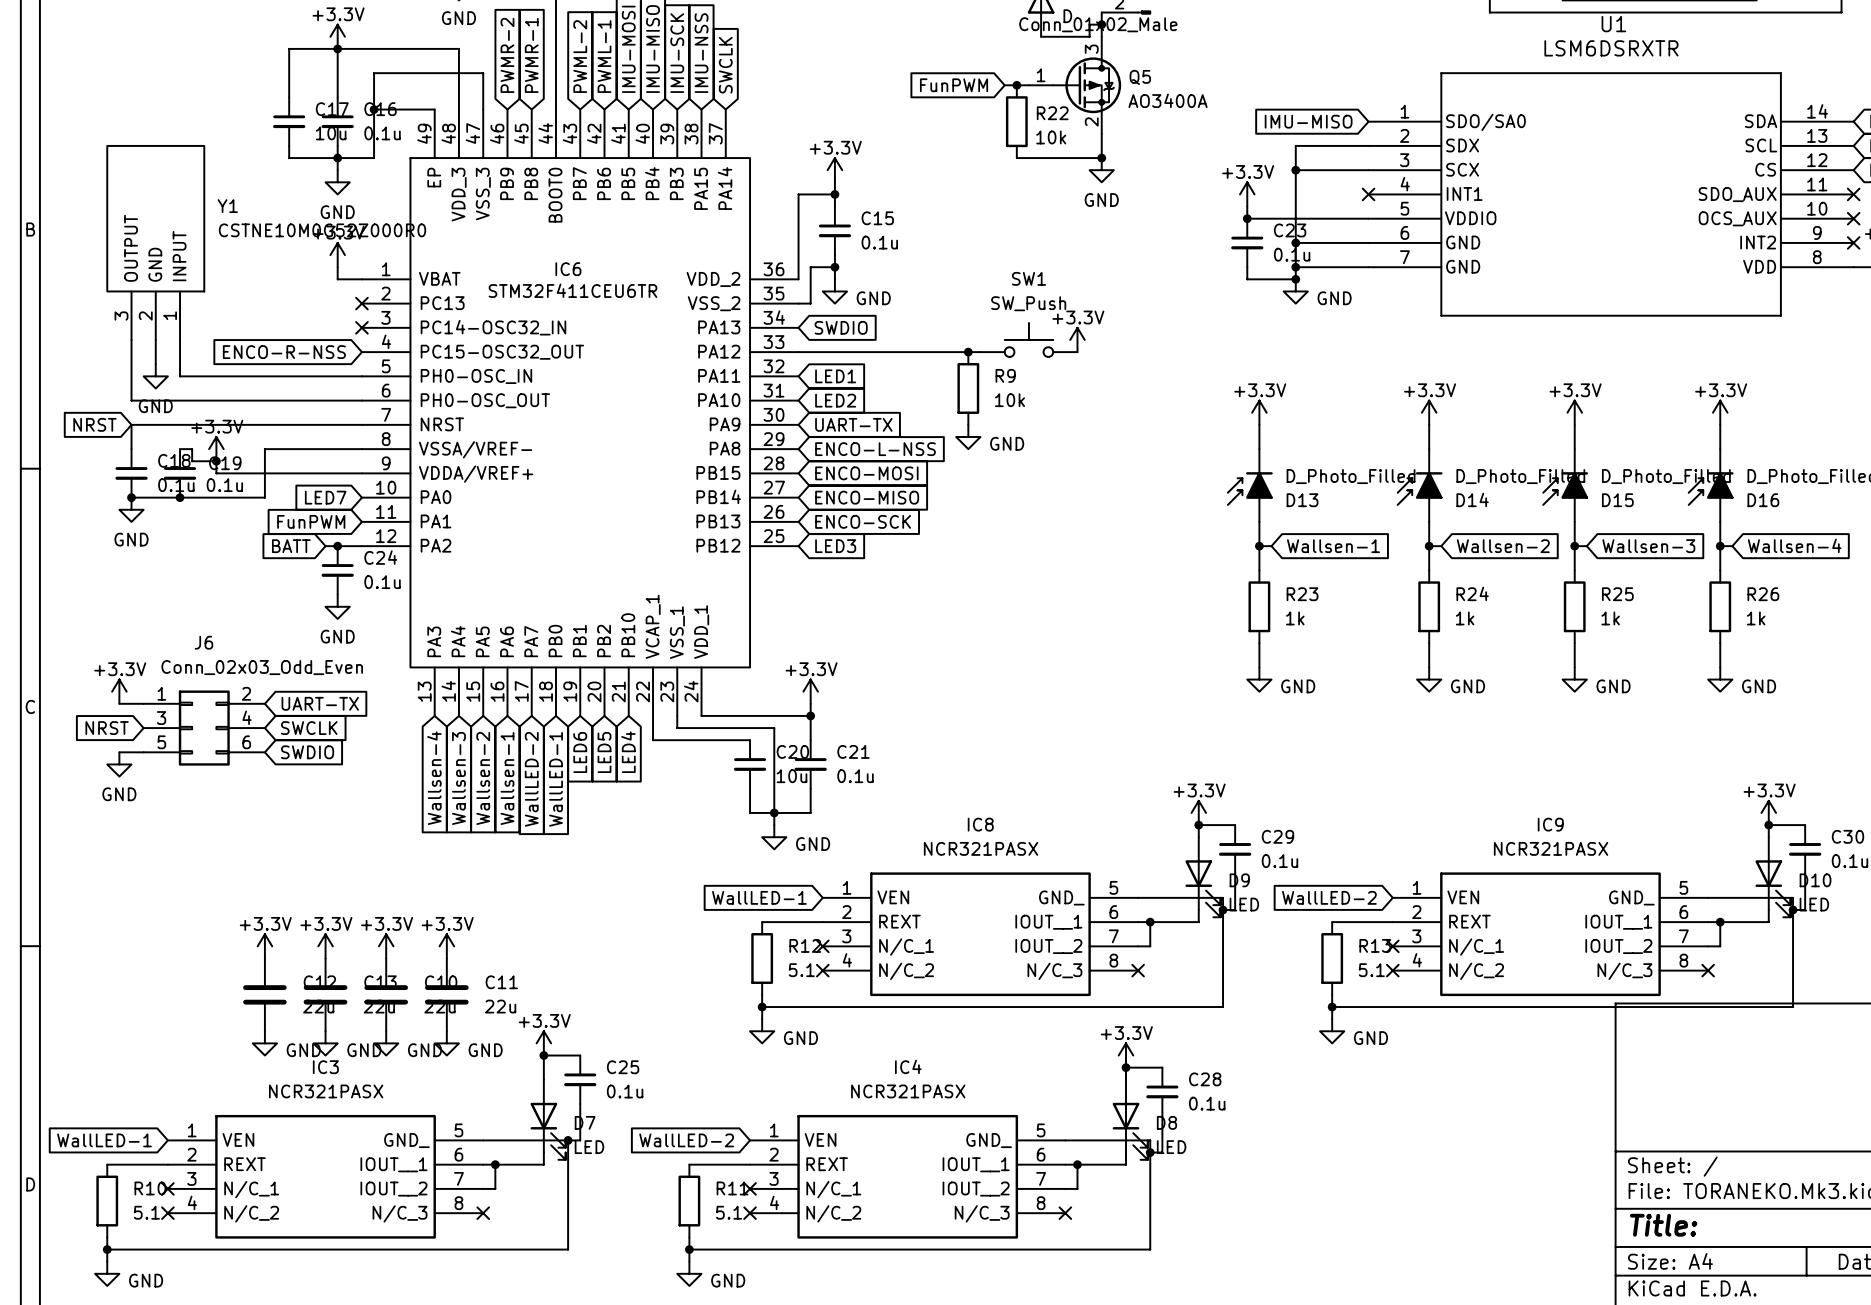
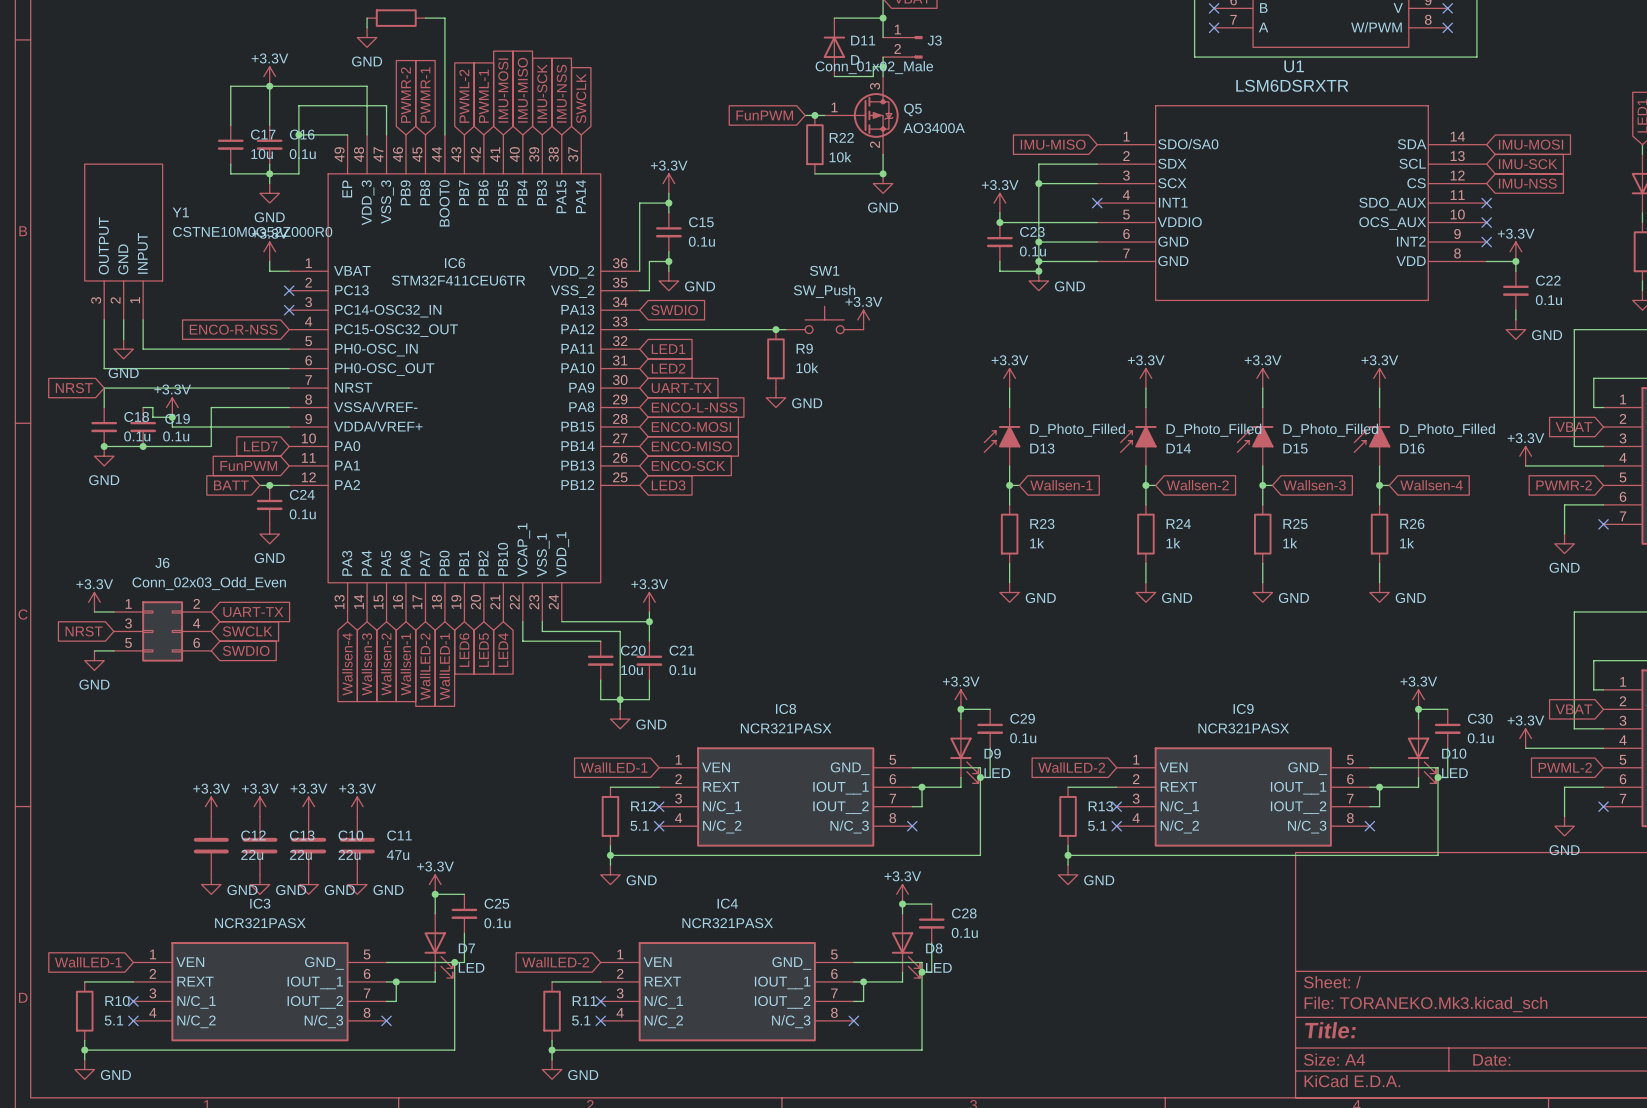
C11 value: 22u (500, 1006) -> 47u (398, 855)

